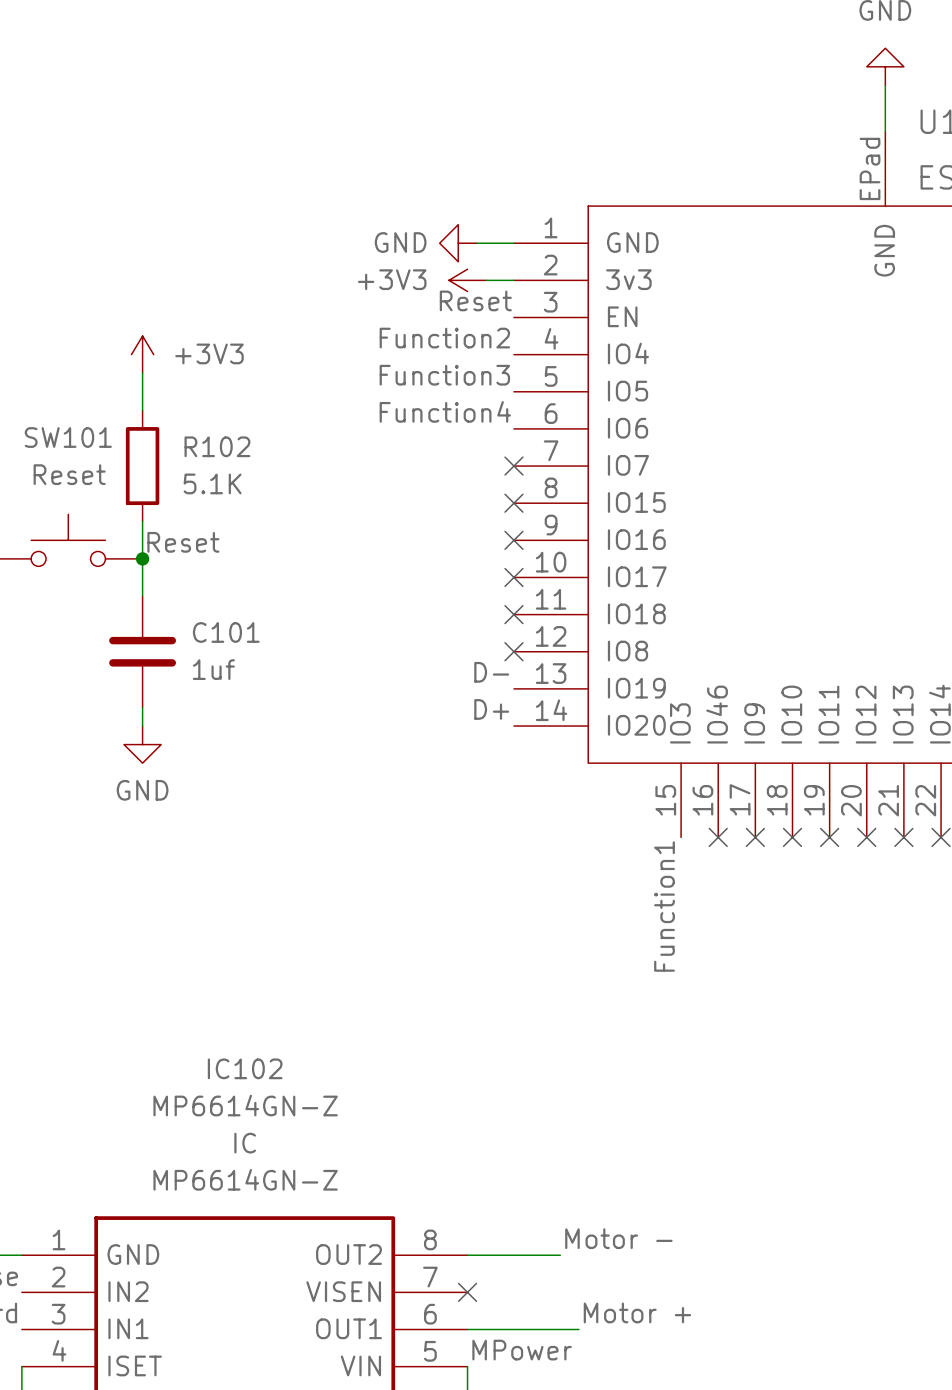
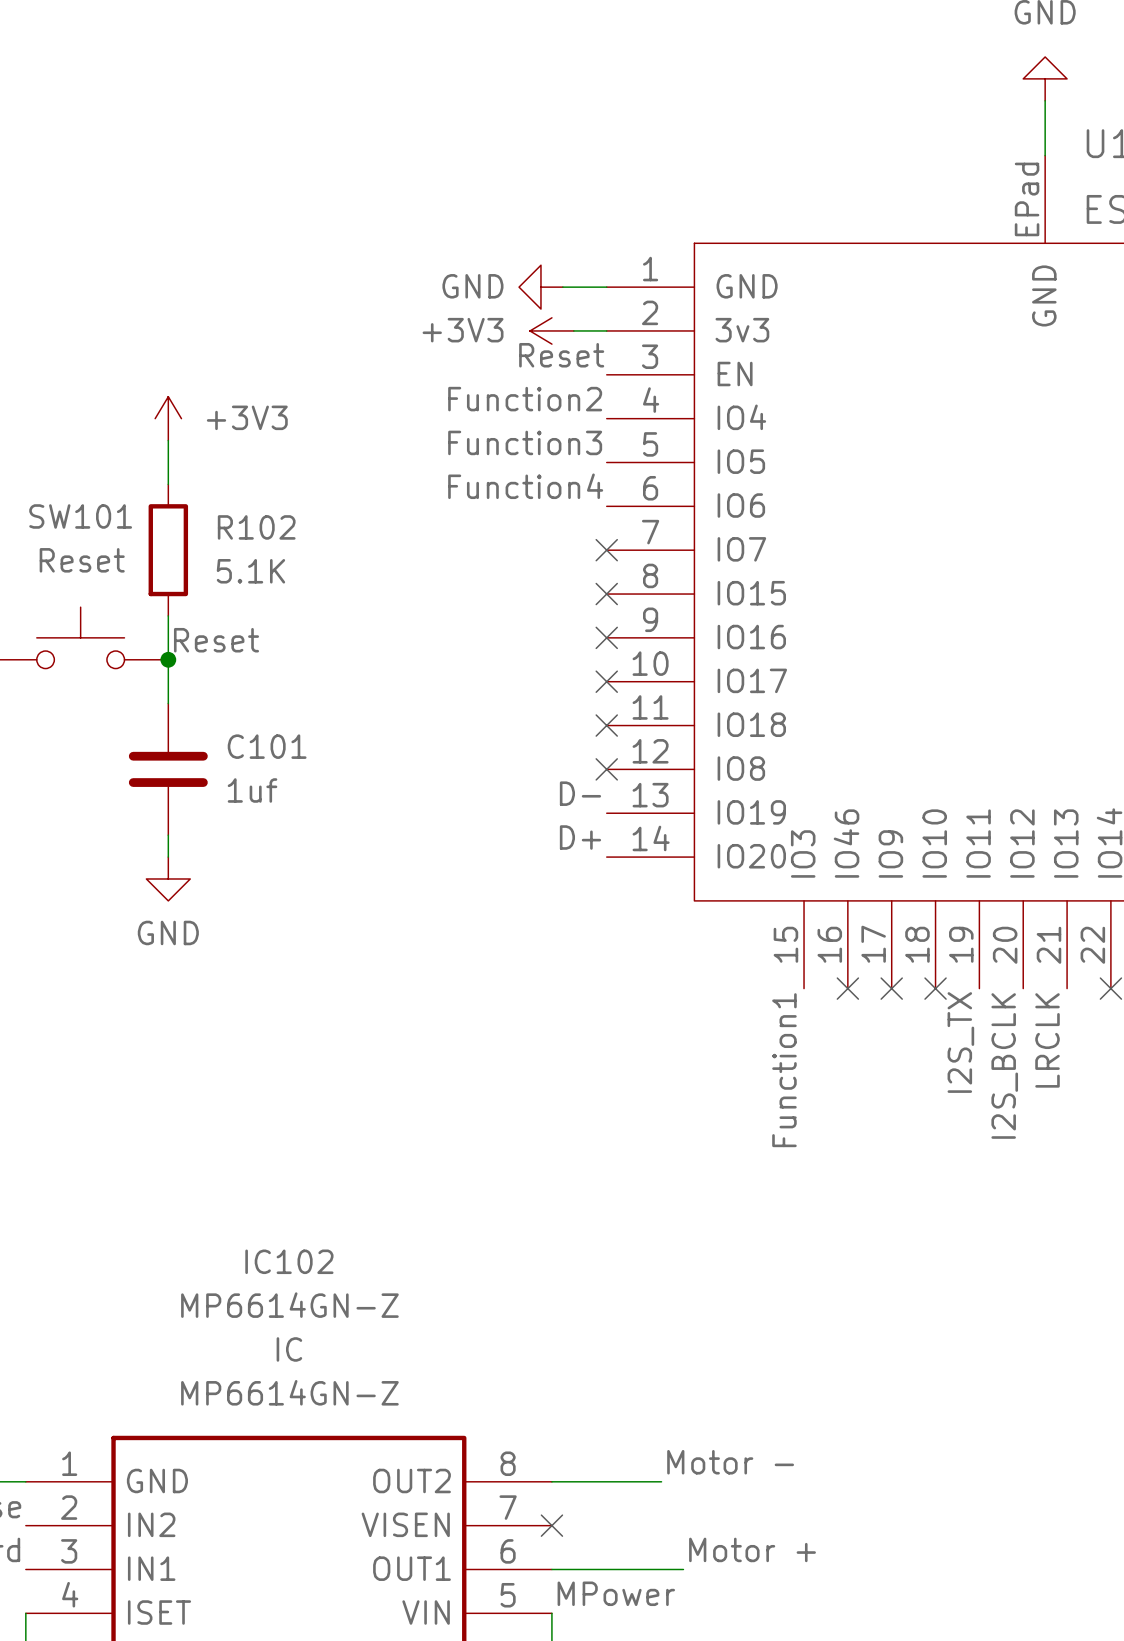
no-connect mark: (829, 837) -> none
no-connect mark: (866, 837) -> none
no-connect mark: (903, 837) -> none
label: none -> LRCLK (1047, 1040)
label: none -> I2S_TX (960, 1042)
label: none -> I2S_BCLK (1004, 1066)

